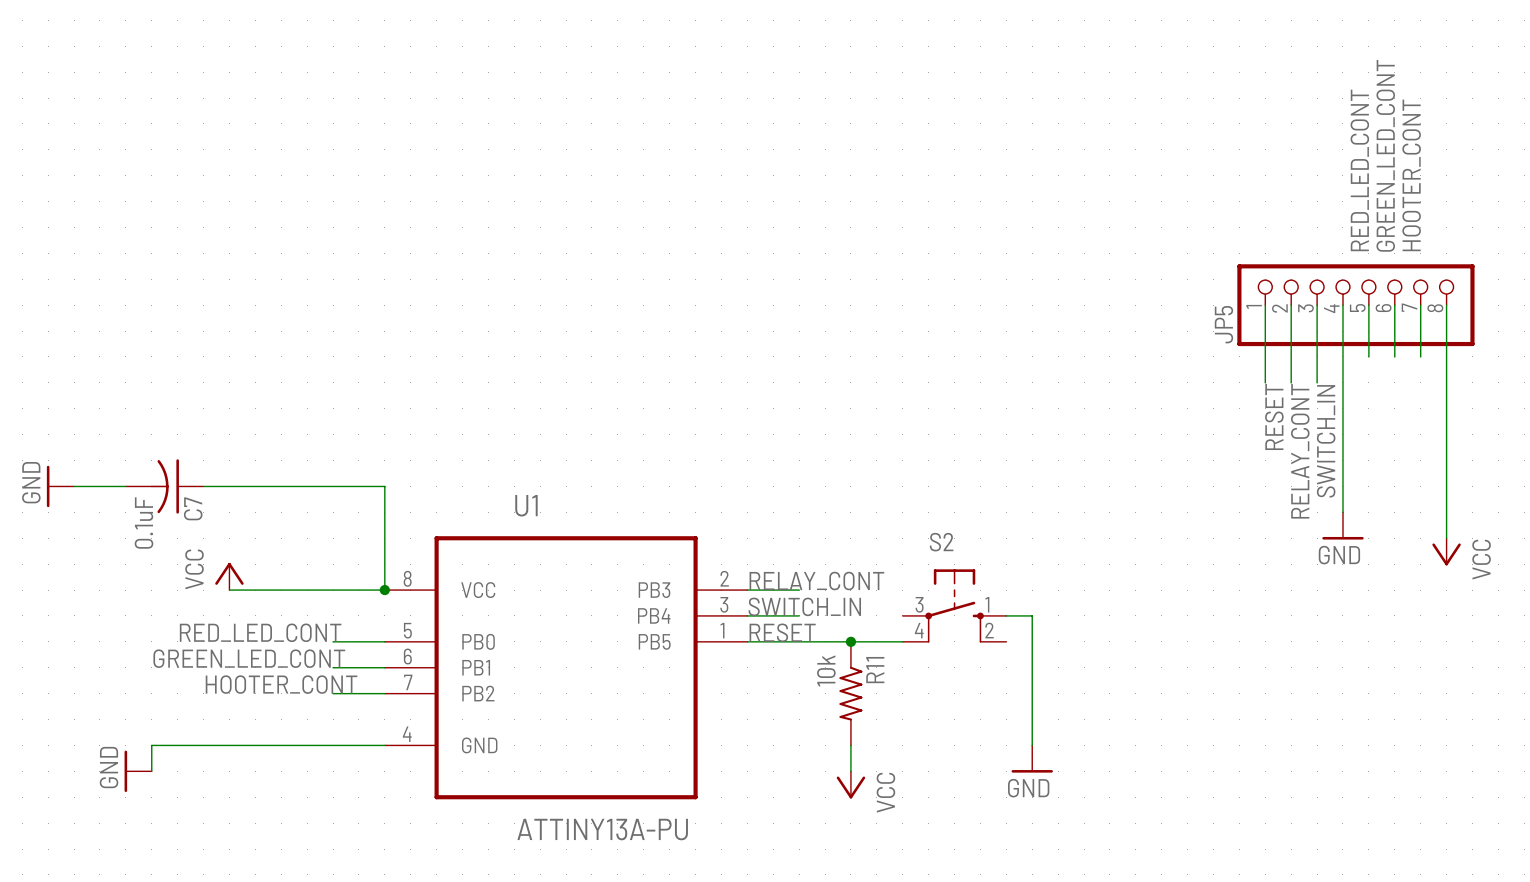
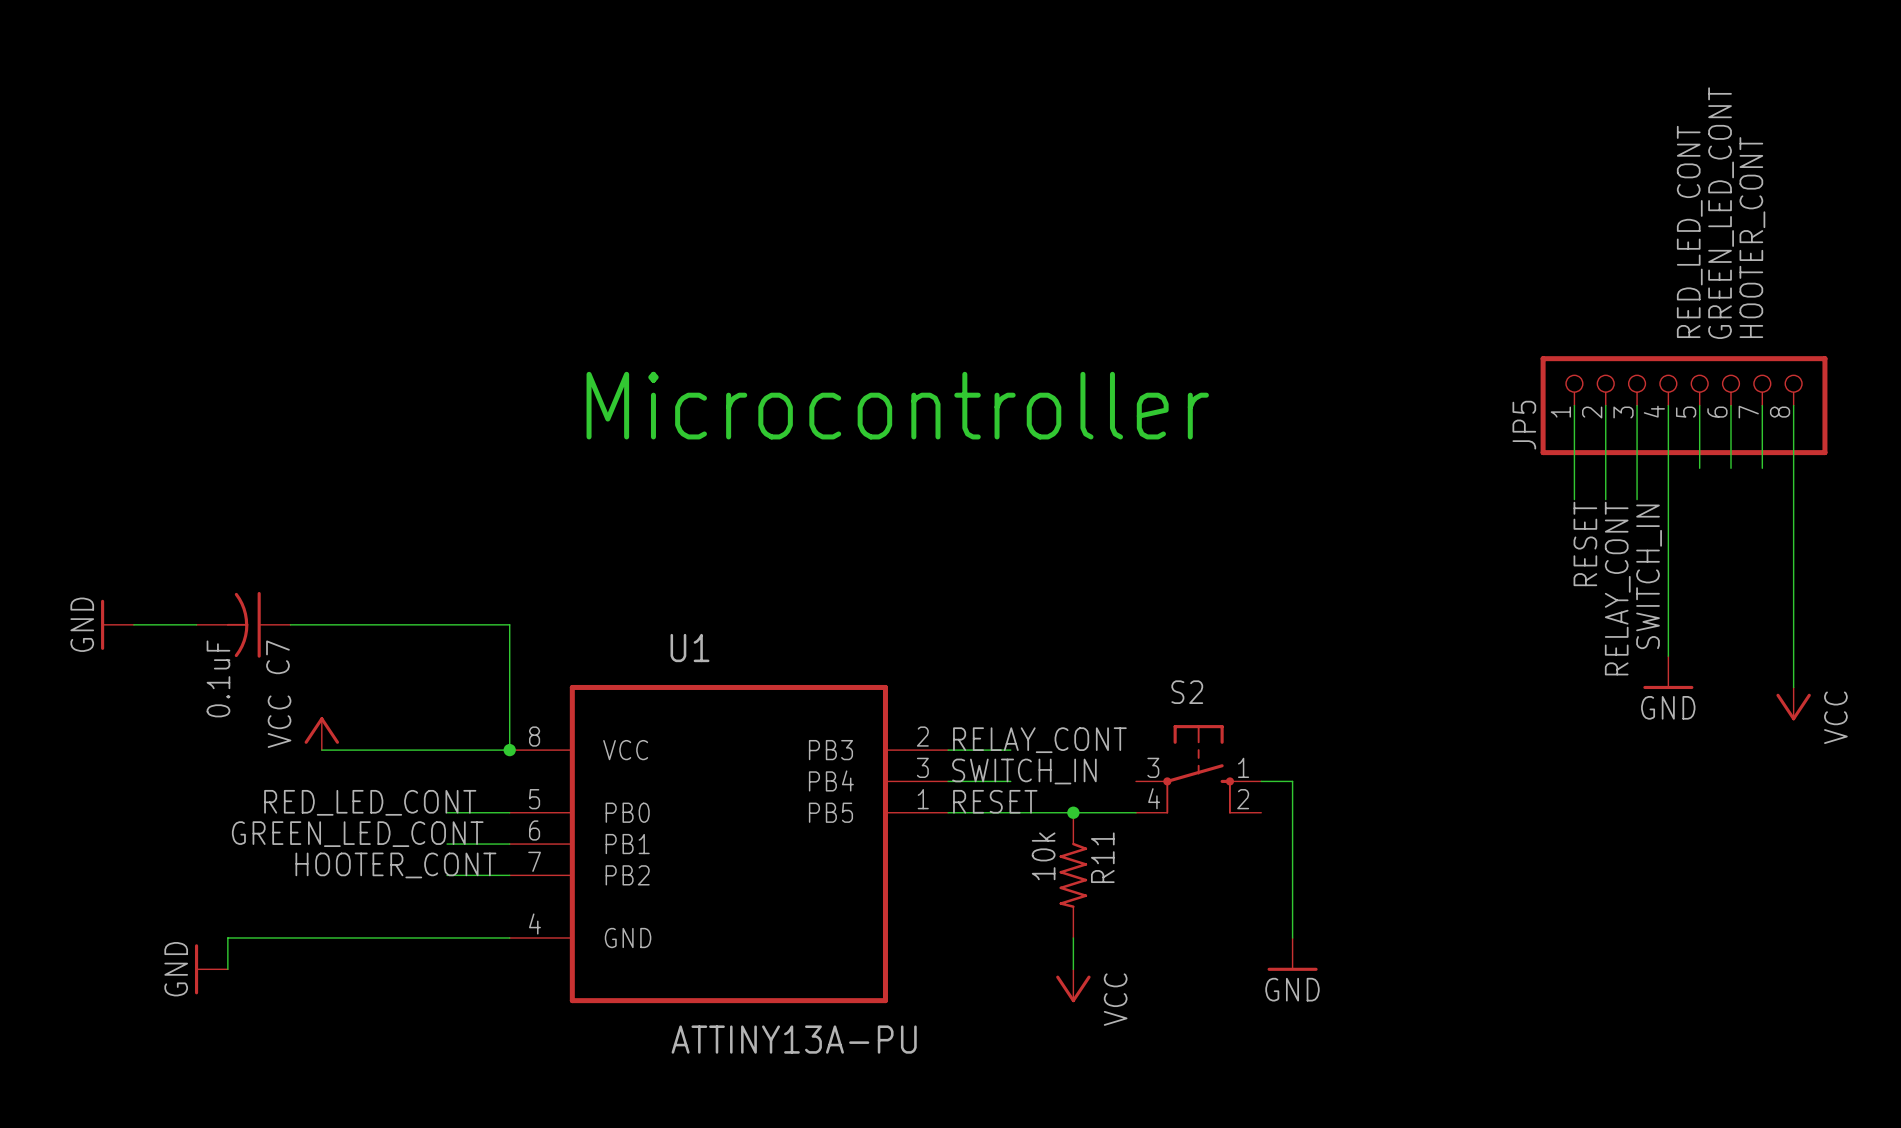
text: none -> Microcontroller (897, 405)

